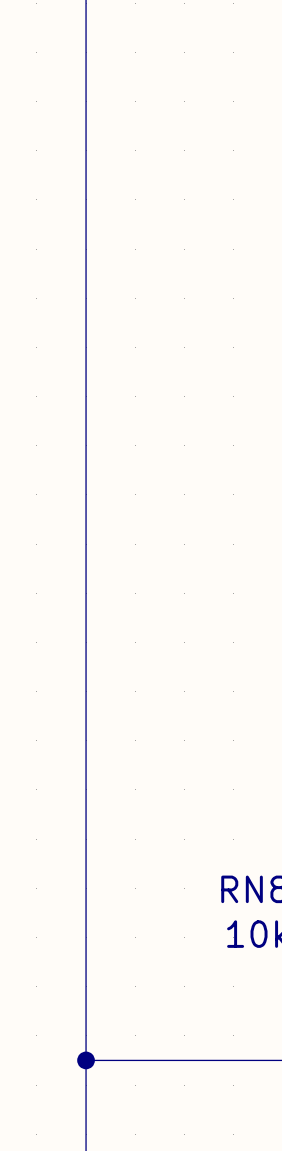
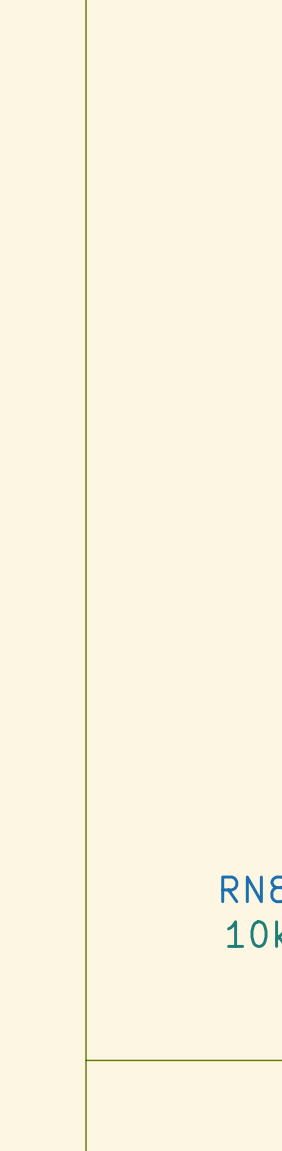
junction: (86, 1060) -> none

